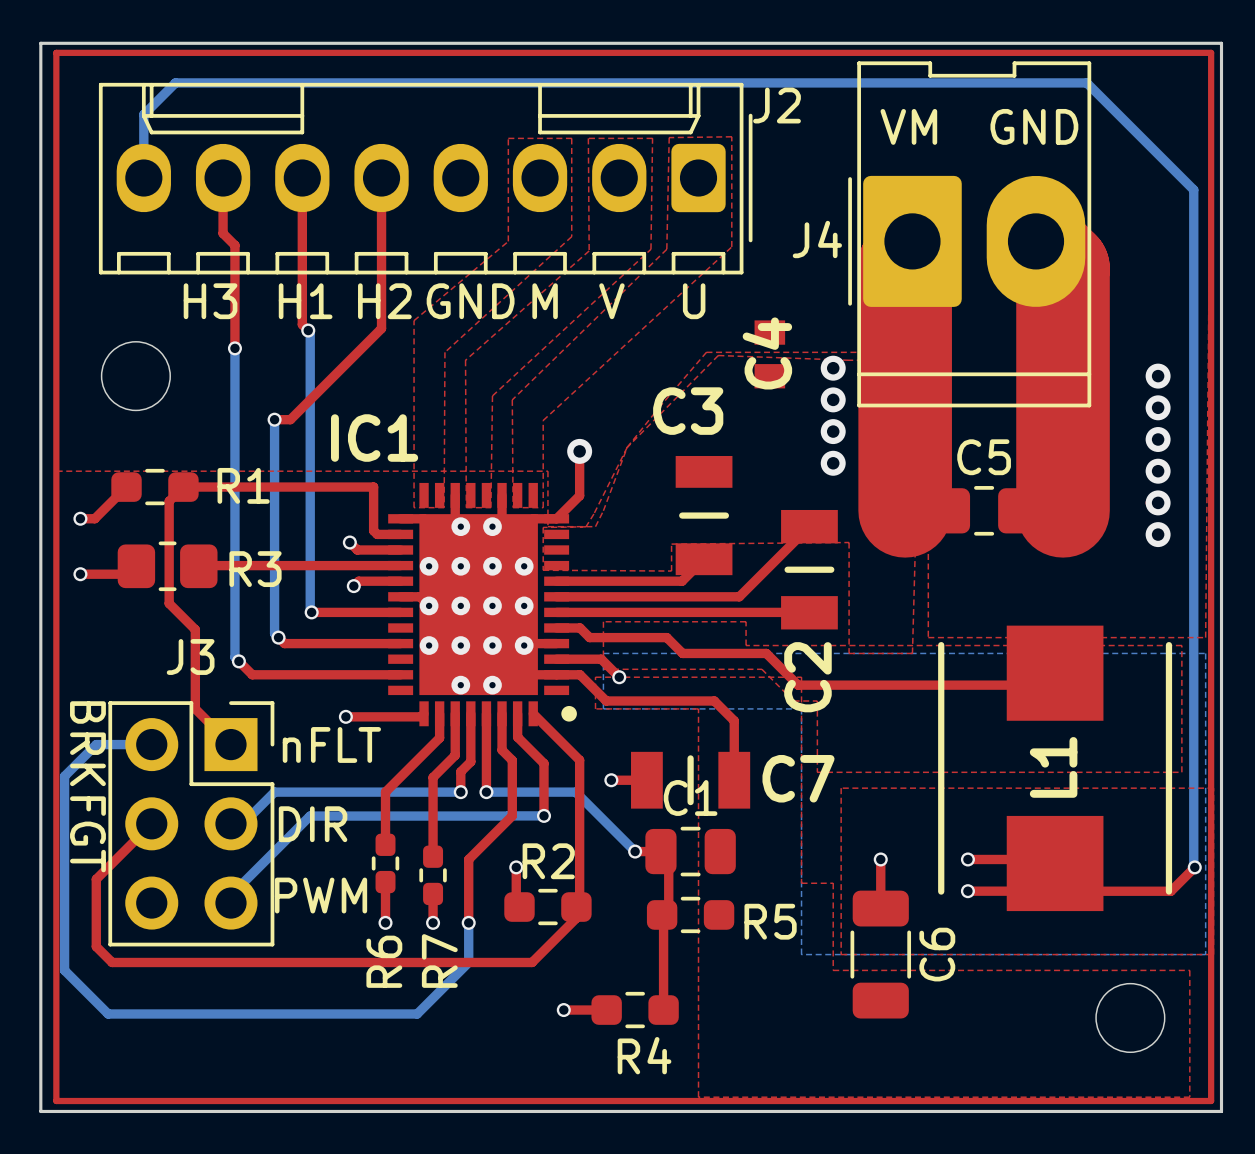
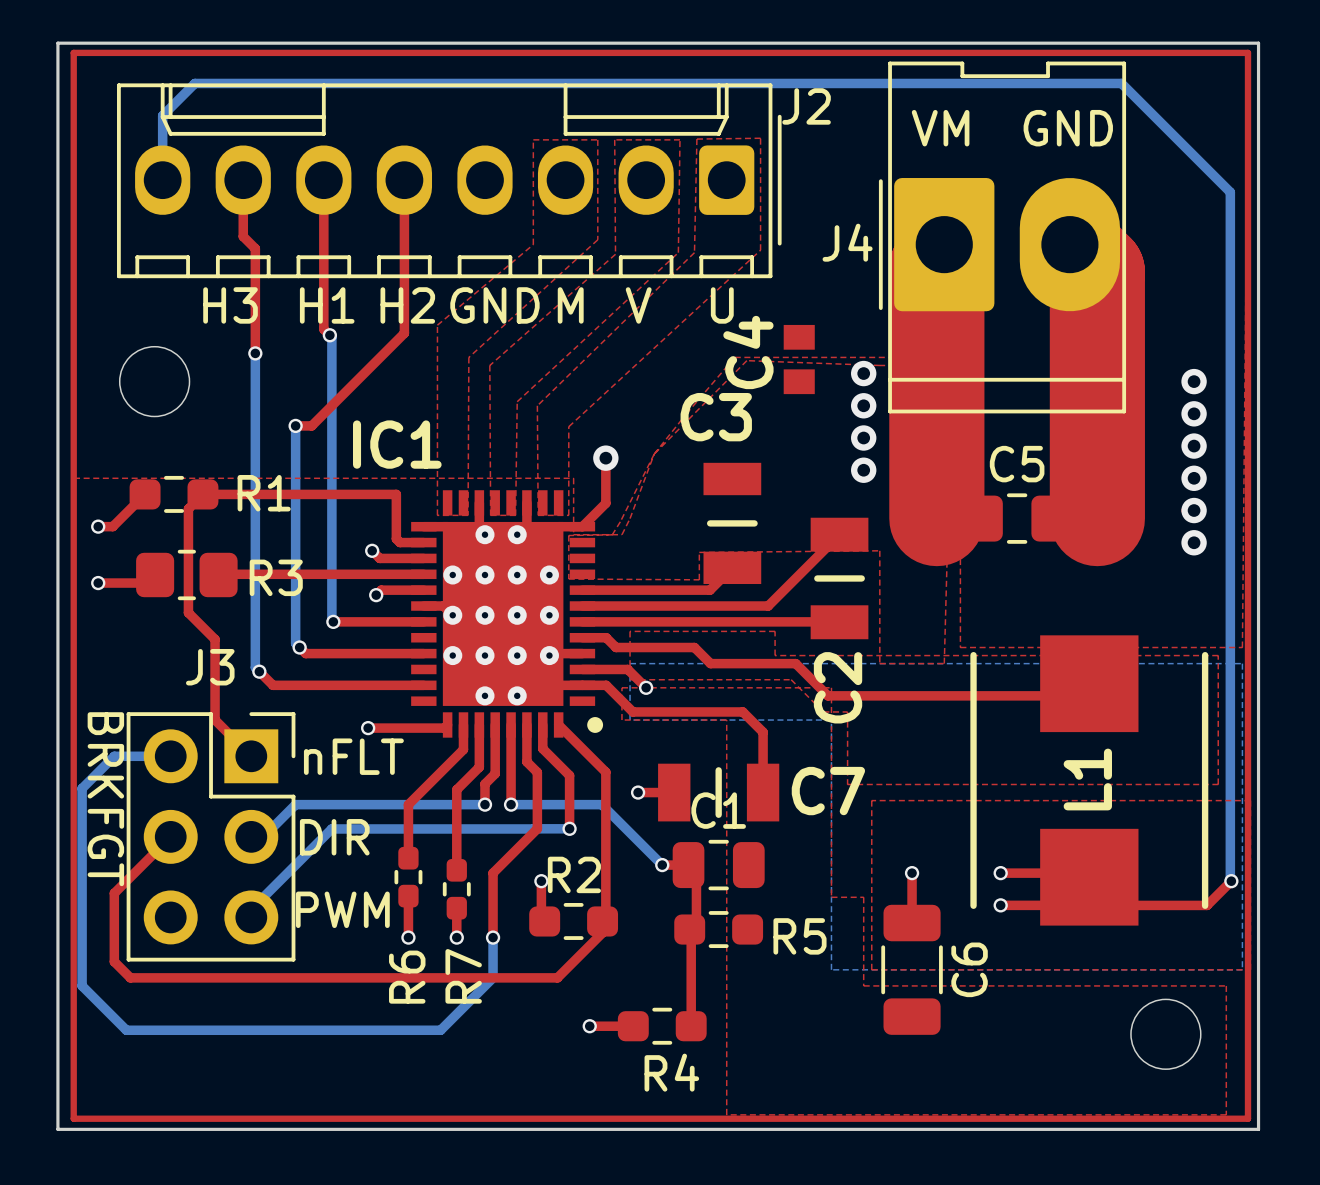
C4 name position: C4 (767, 353) -> C4 (748, 352)

